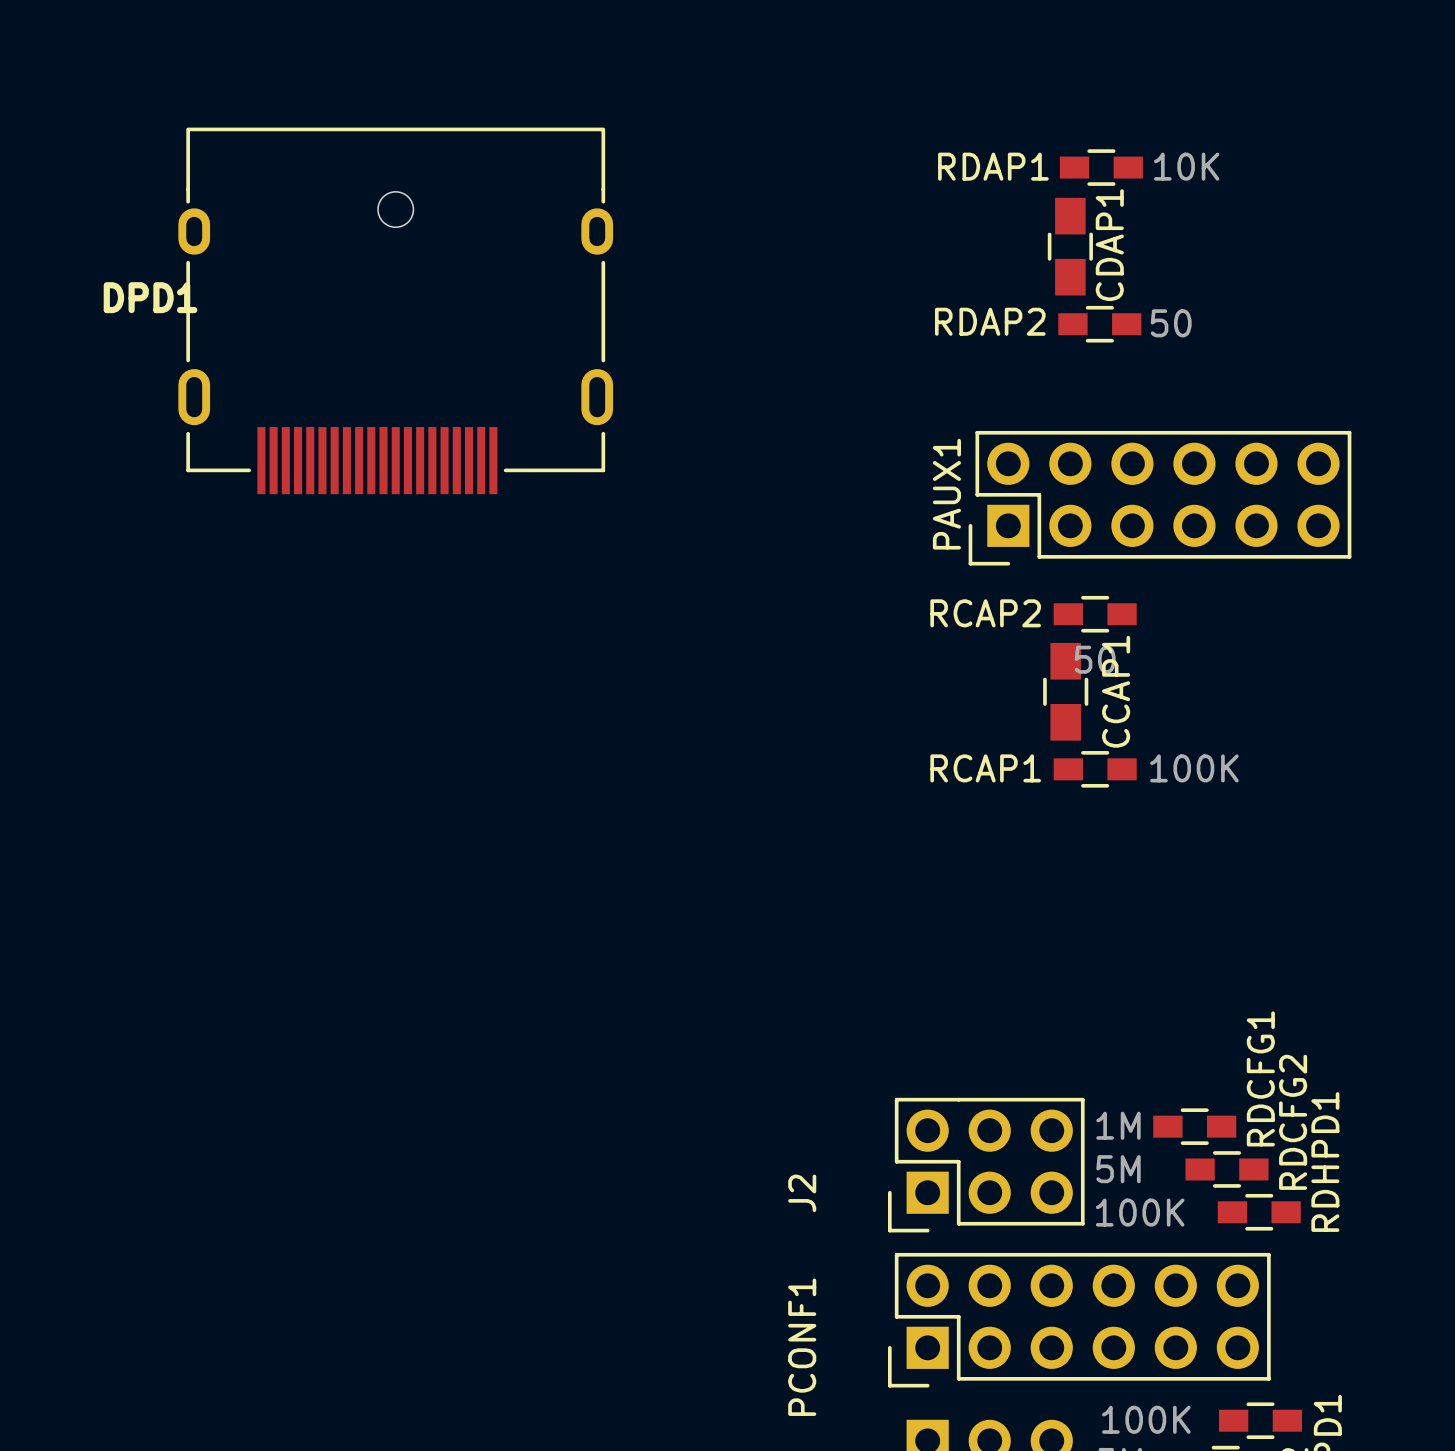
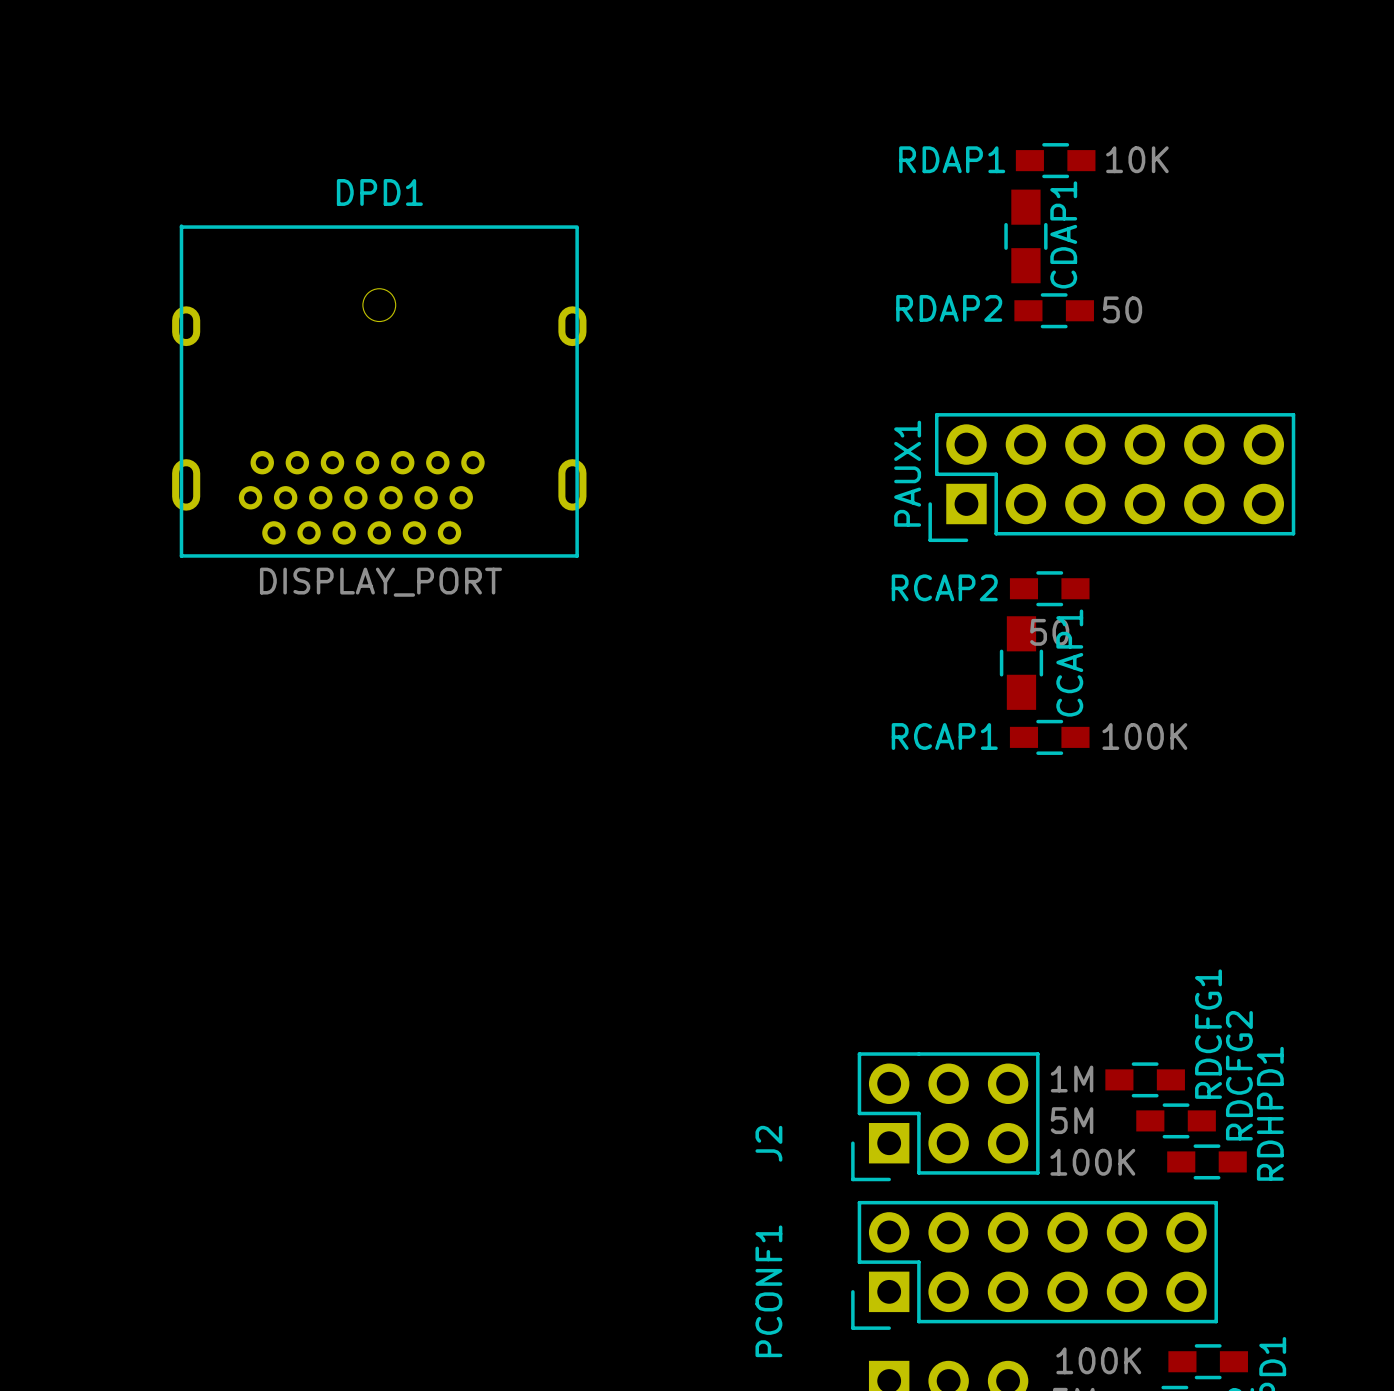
DPD1 footprint: [178, 127, 614, 495] -> [172, 224, 587, 558]
DPD1 name position: DPD1 (150, 297) -> DPD1 (379, 192)
DPD1 value: none -> DISPLAY_PORT (380, 582)

